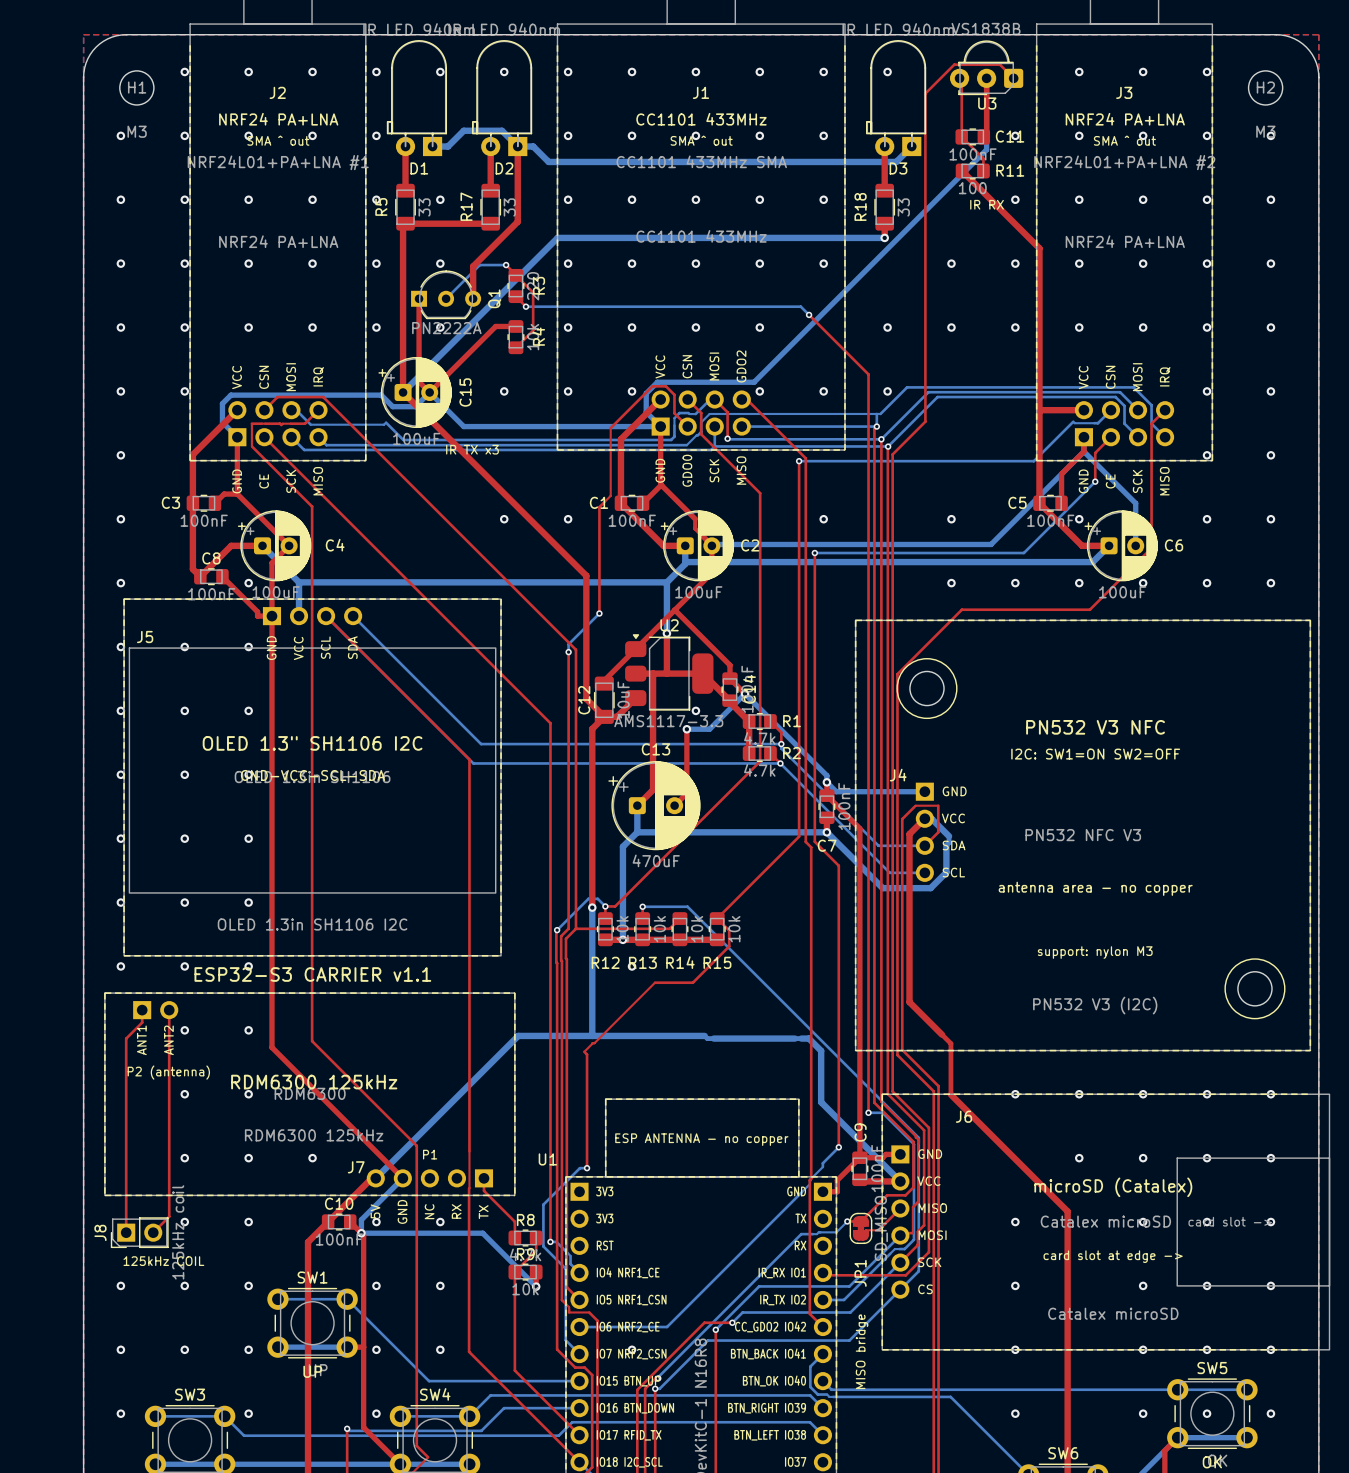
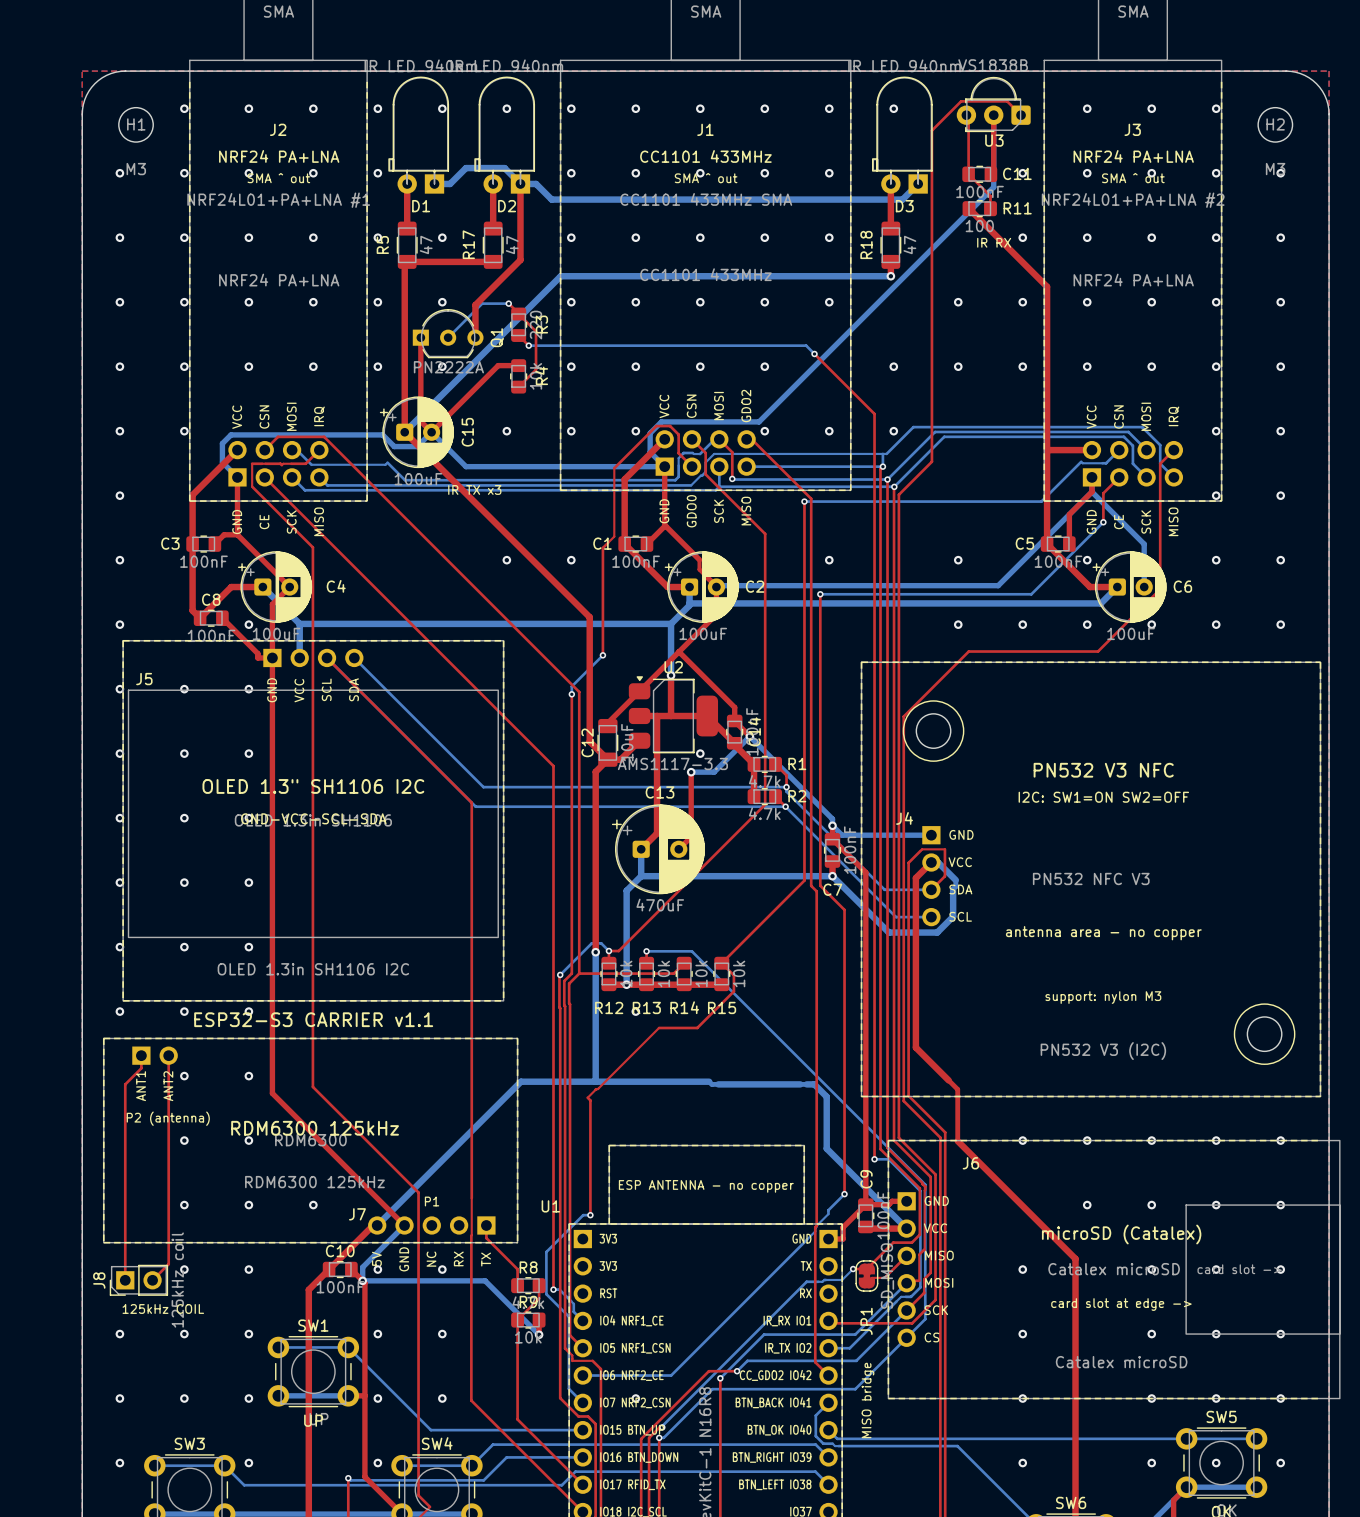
R5 value: 33 (424, 207) -> 47 (426, 244)
R17 value: 33 (509, 207) -> 47 (512, 244)
R18 value: 33 (903, 207) -> 47 (909, 244)

